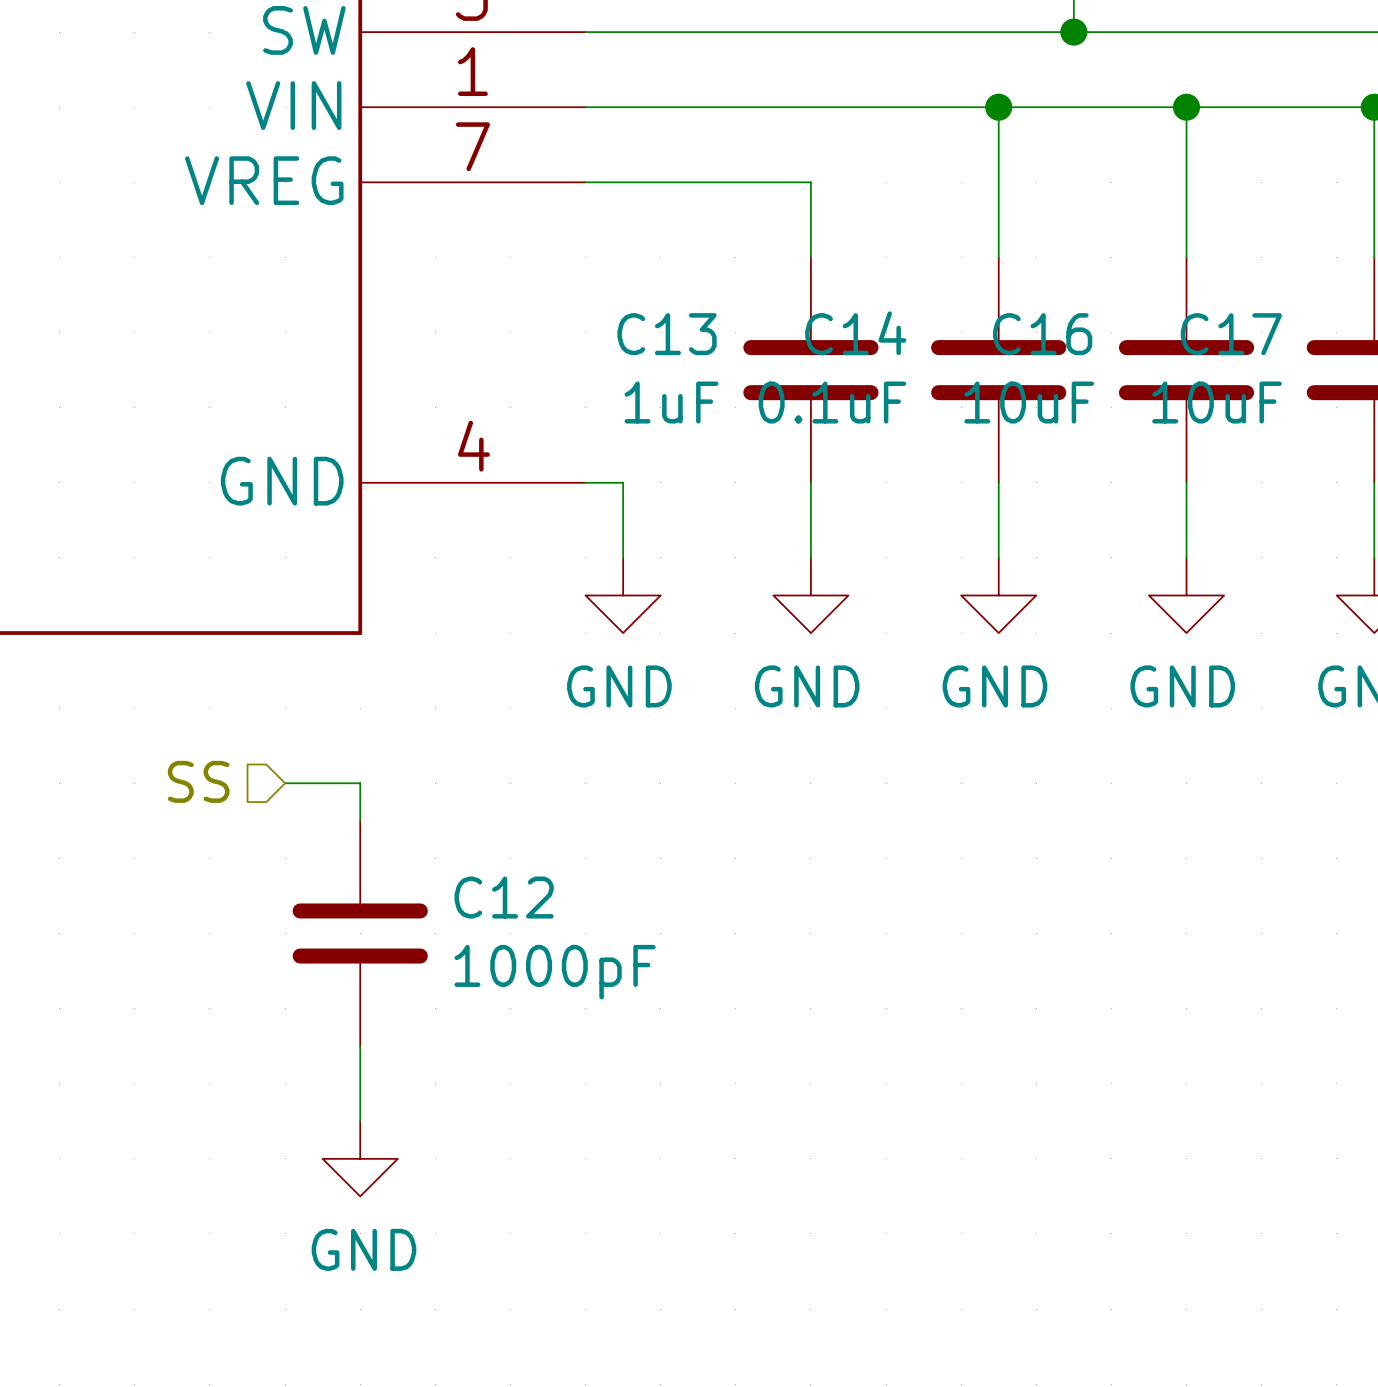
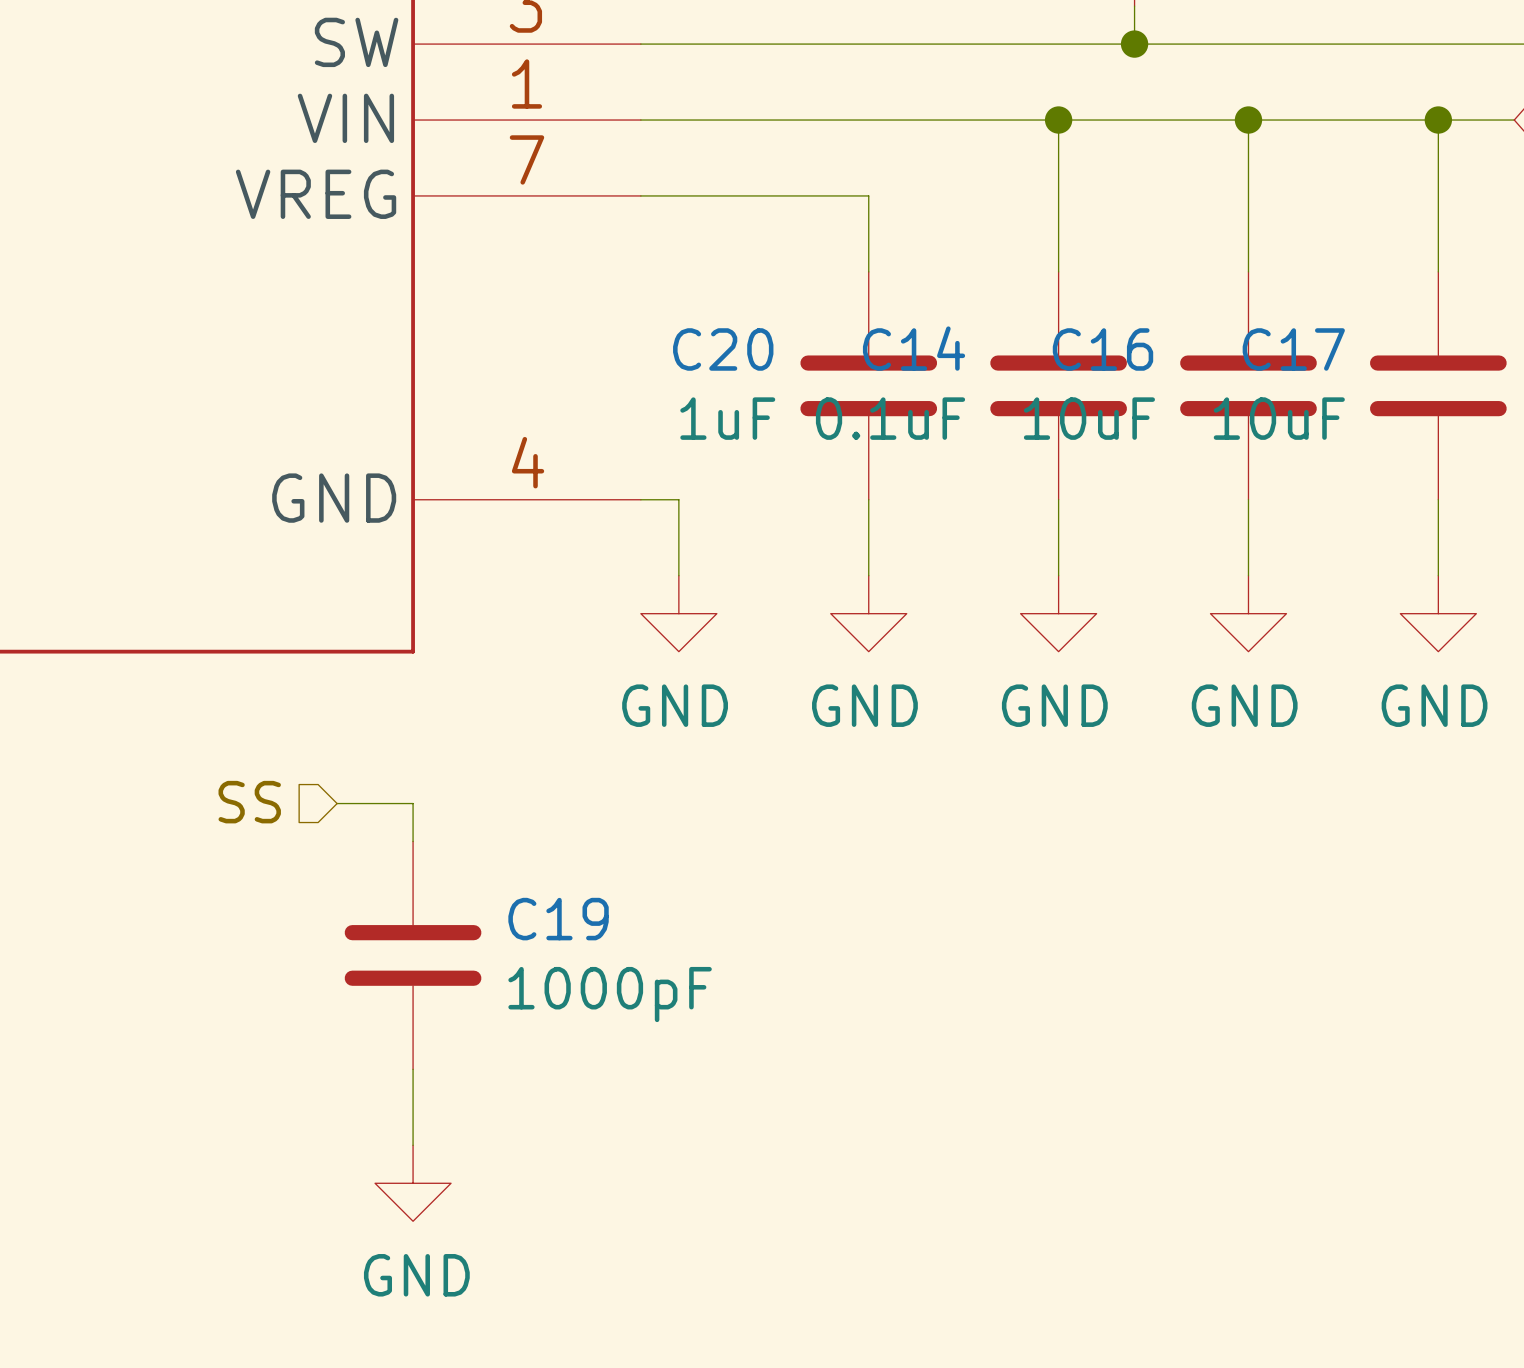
C13 name: C13 (667, 334) -> C20 (723, 349)
C12 name: C12 (504, 897) -> C19 (558, 919)

